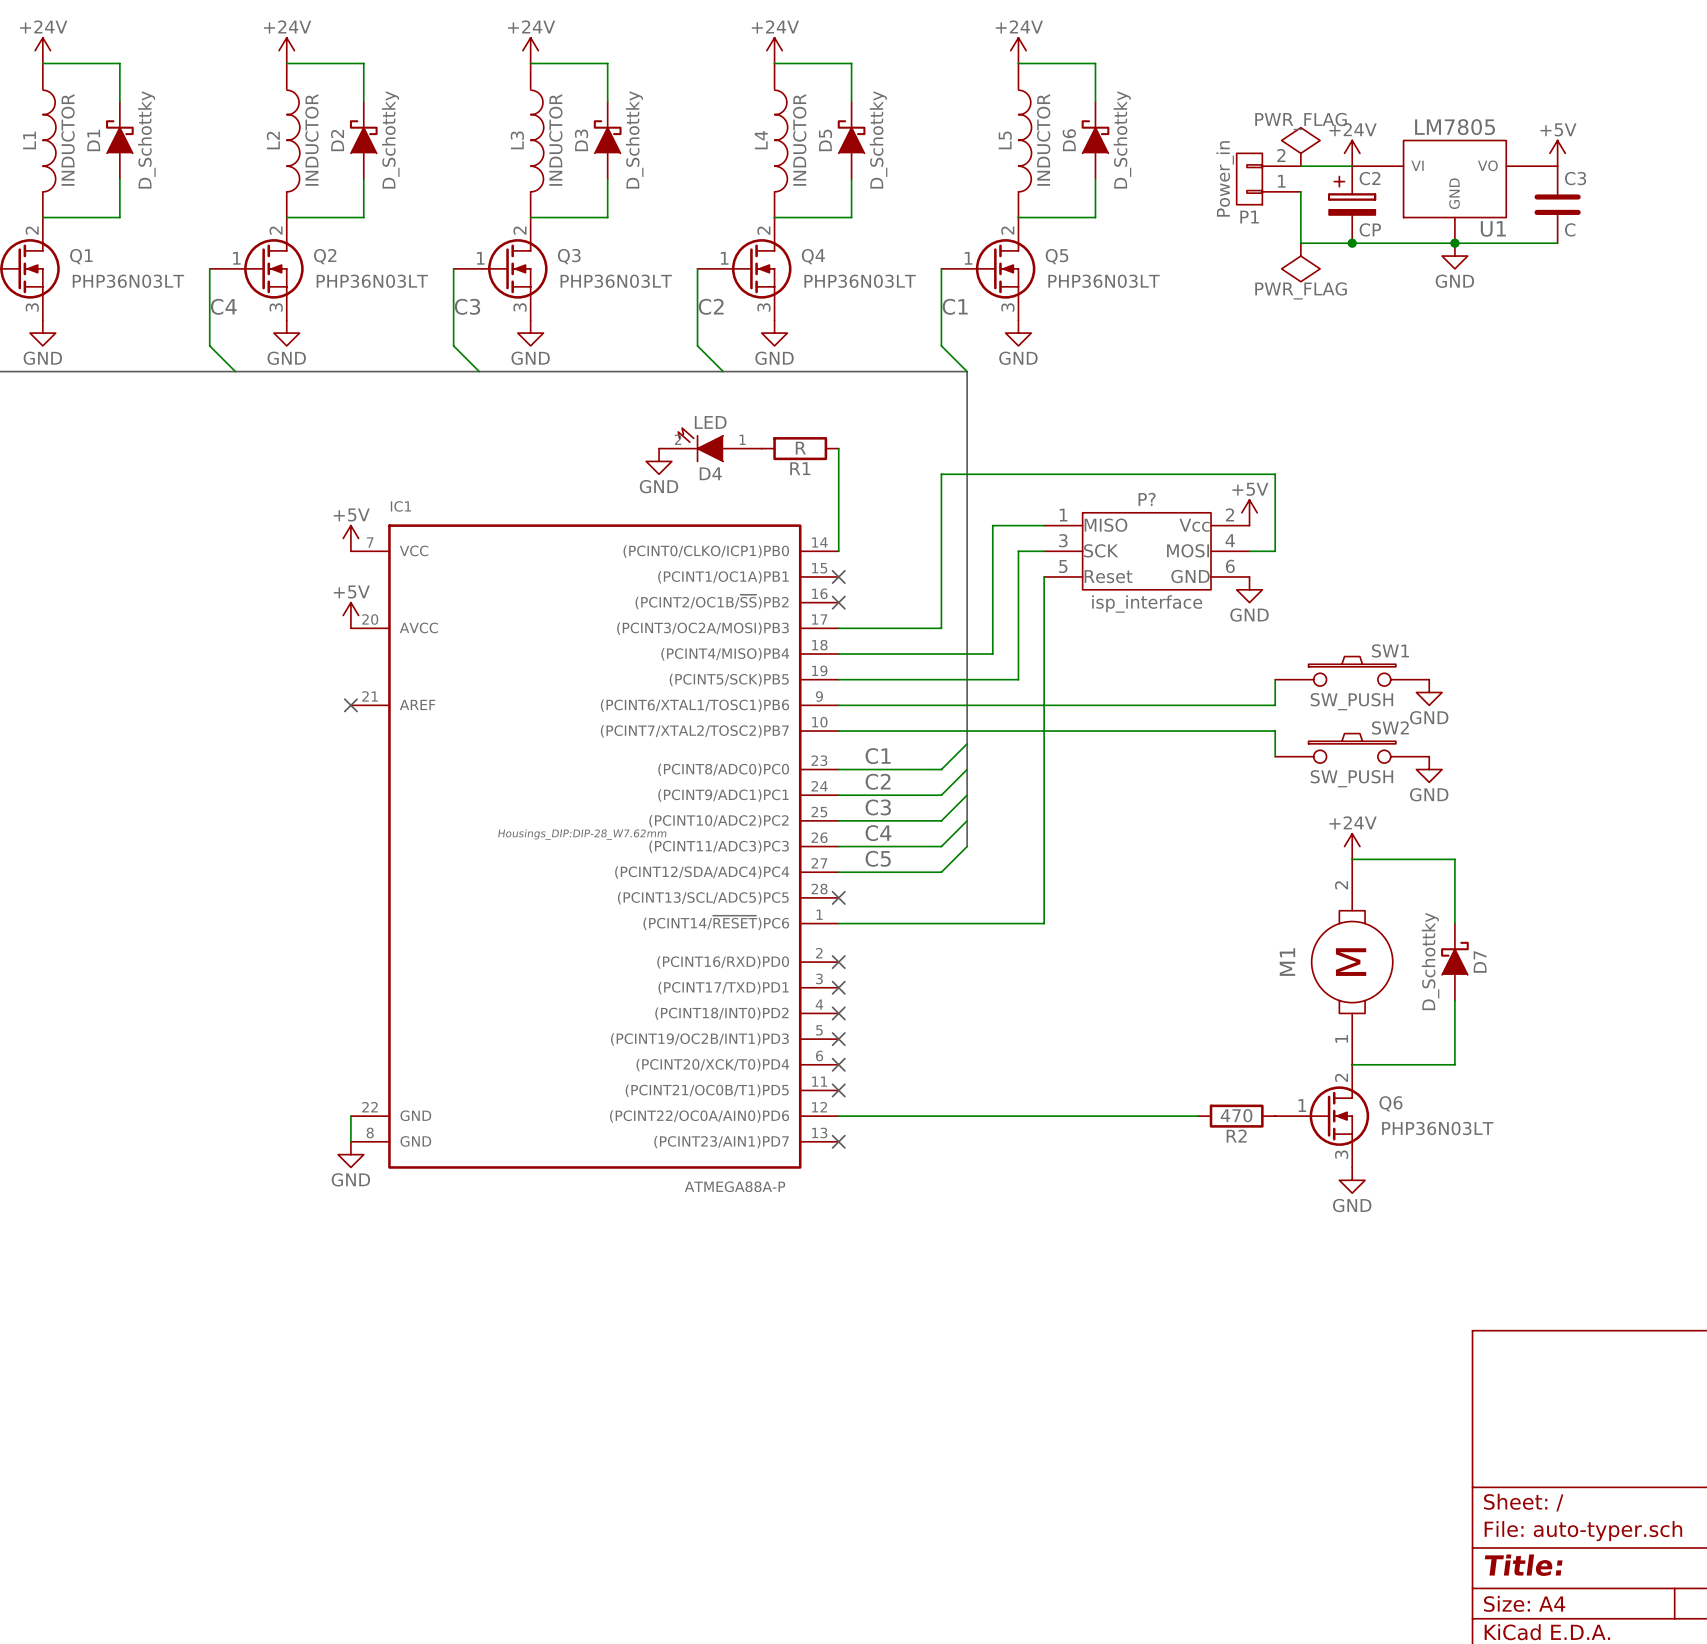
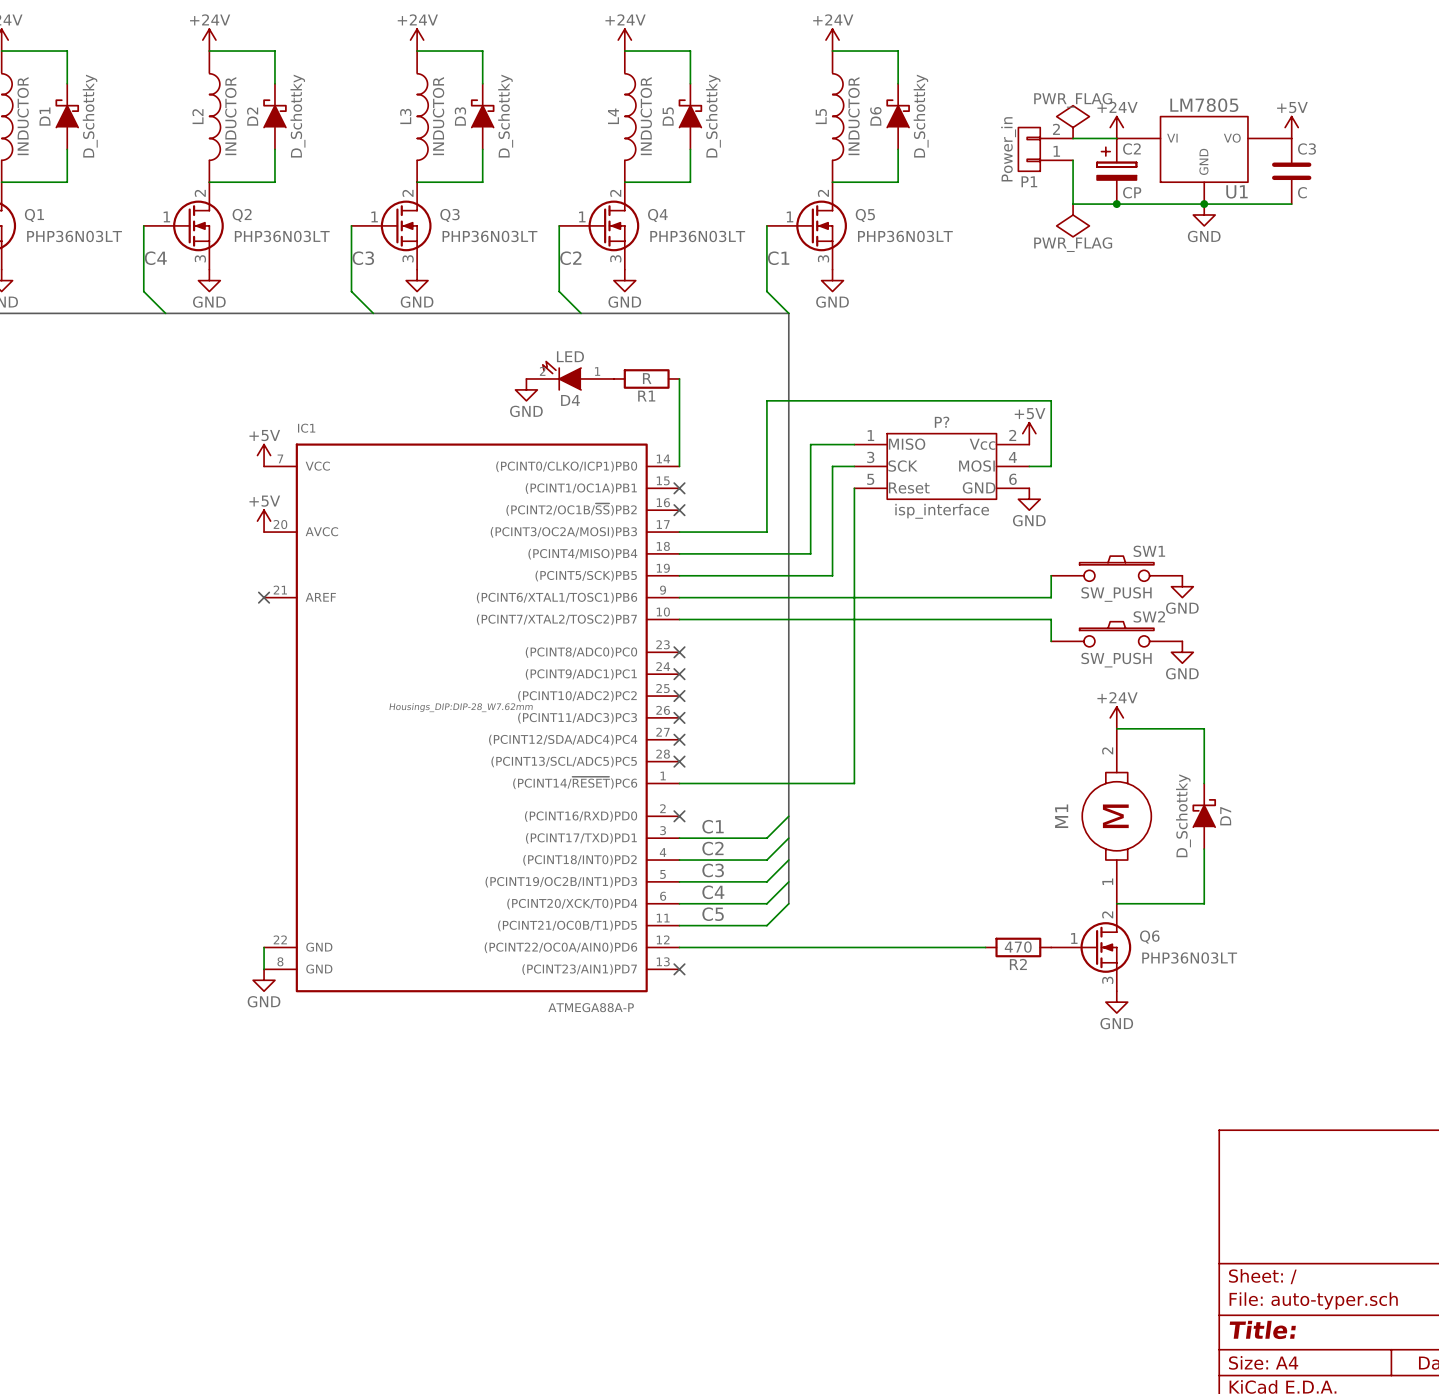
wire: (967, 743) (941, 769) (838, 769) -> (788, 816) (766, 838) (679, 838)
label position: C1 (878, 756) -> C1 (713, 826)
no-connect mark: none -> (679, 652)
wire: (967, 769) (941, 795) (838, 795) -> (788, 838) (766, 860) (679, 860)
label position: C2 (878, 781) -> C2 (712, 848)
no-connect mark: none -> (679, 674)
wire: (967, 795) (941, 820) (838, 820) -> (788, 860) (766, 881) (679, 881)
label position: C3 (878, 807) -> C3 (713, 870)
no-connect mark: none -> (679, 696)
wire: (967, 820) (941, 846) (838, 846) -> (788, 881) (766, 903) (679, 903)
label position: C4 (878, 833) -> C4 (713, 892)
no-connect mark: none -> (679, 717)
wire: (967, 846) (941, 872) (838, 872) -> (788, 903) (766, 925) (679, 925)
bus: none -> (788, 717) (788, 903)
label position: C5 (878, 858) -> C5 (713, 914)
no-connect mark: none -> (679, 739)
no-connect mark: (838, 987) -> none
no-connect mark: (838, 1013) -> none
no-connect mark: (838, 1039) -> none
no-connect mark: (838, 1064) -> none
no-connect mark: (838, 1090) -> none

